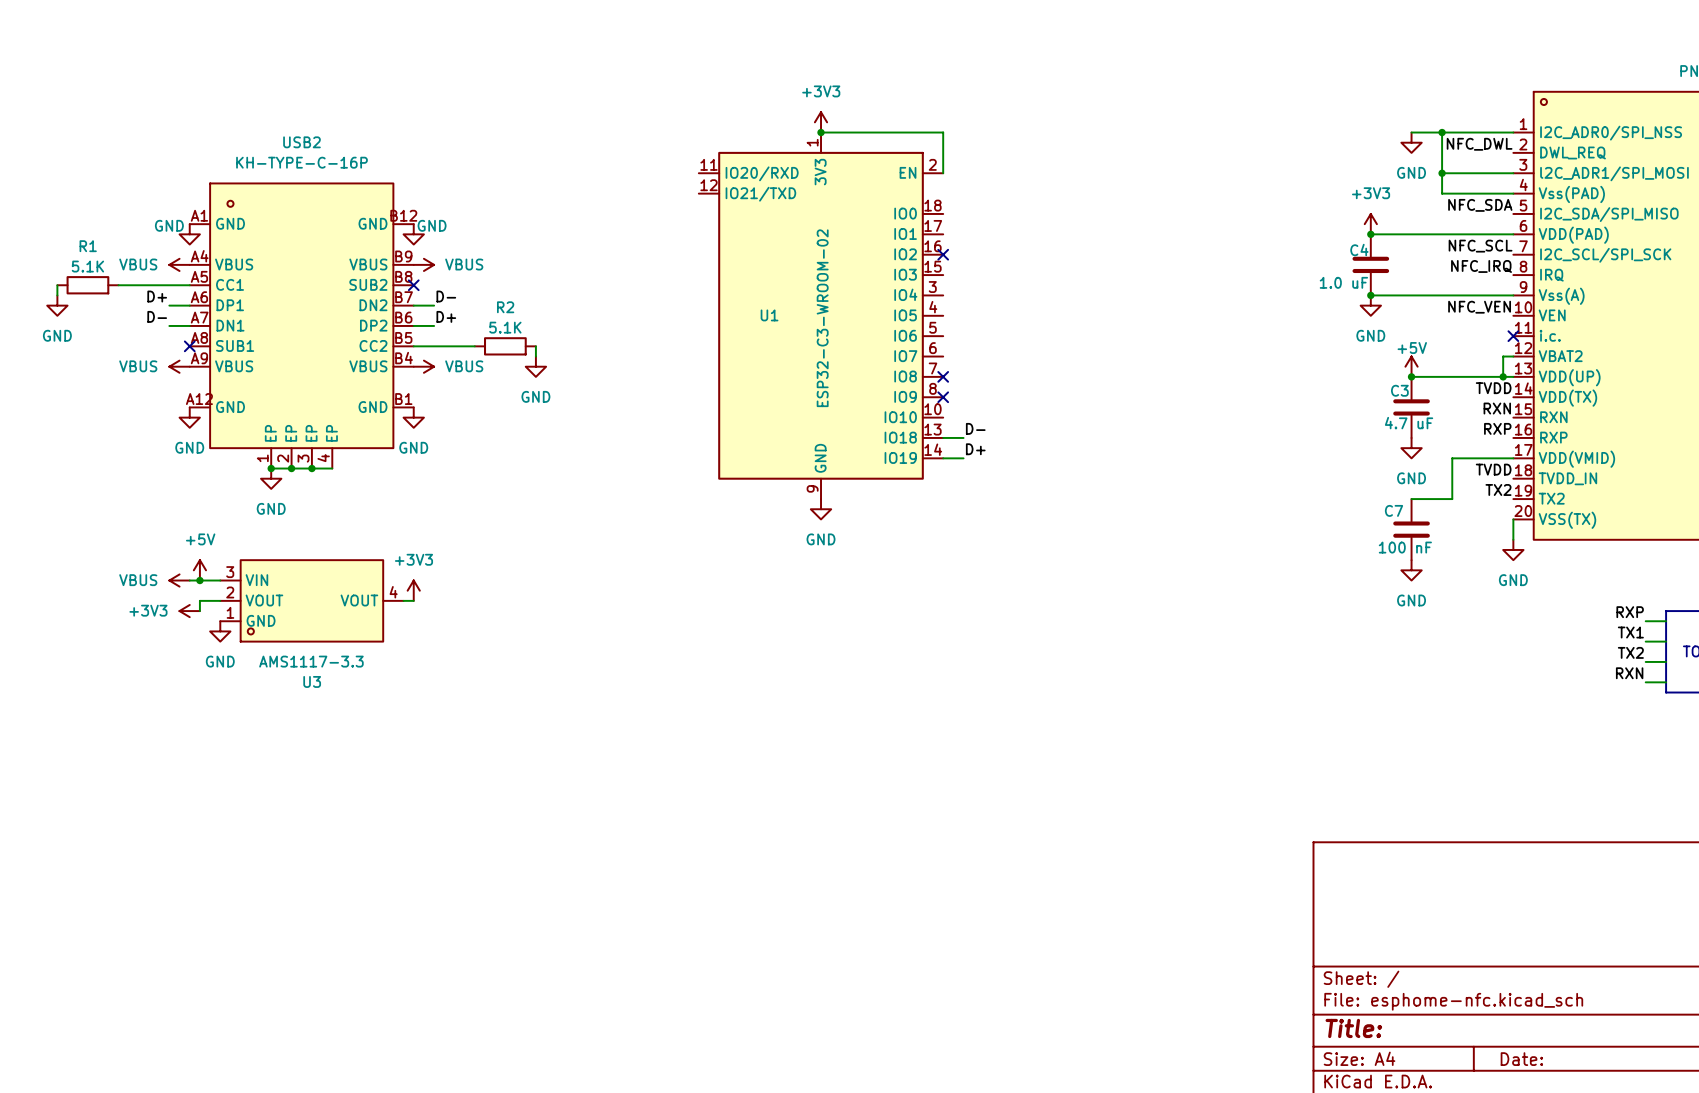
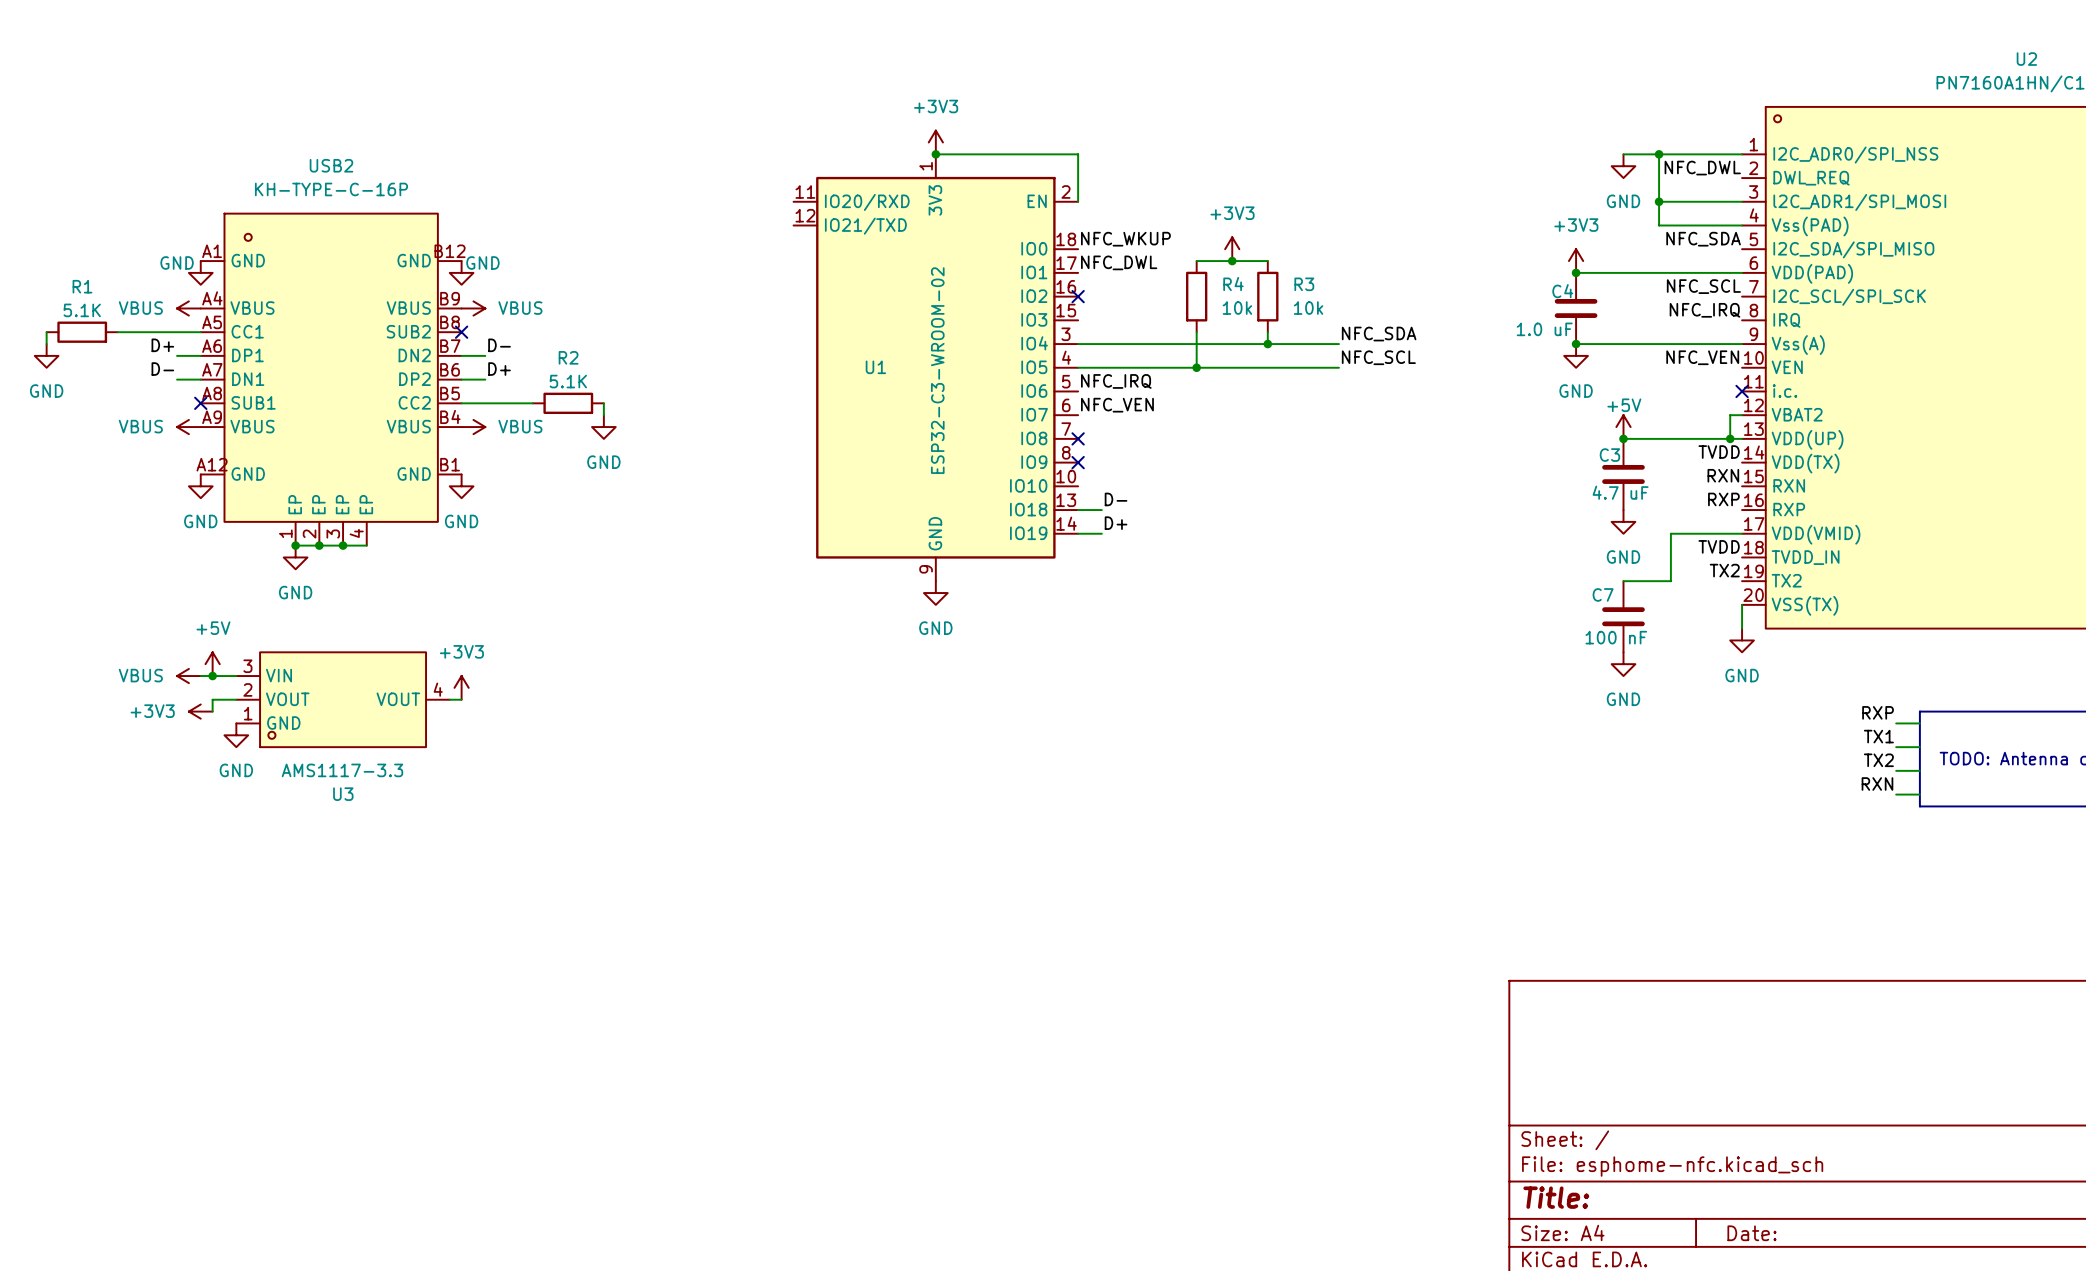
label: none -> NFC_WKUP (1125, 239)
power symbol: none -> +3V3 (1232, 249)
wire: none -> (1196, 261) (1267, 261)
junction: none -> (1232, 261)
label: none -> NFC_DWL (1119, 262)
R4: none -> 10k (1196, 296)
R3: none -> 10k (1267, 296)
wire: none -> (1196, 332) (1196, 367)
wire: none -> (1267, 332) (1267, 344)
label: none -> NFC_SDA (1379, 334)
wire: none -> (1078, 344) (1338, 344)
junction: none -> (1267, 344)
label: none -> NFC_SCL (1378, 357)
wire: none -> (1078, 367) (1338, 367)
junction: none -> (1196, 367)
label: none -> NFC_IRQ (1116, 381)
label: none -> NFC_VEN (1117, 405)

